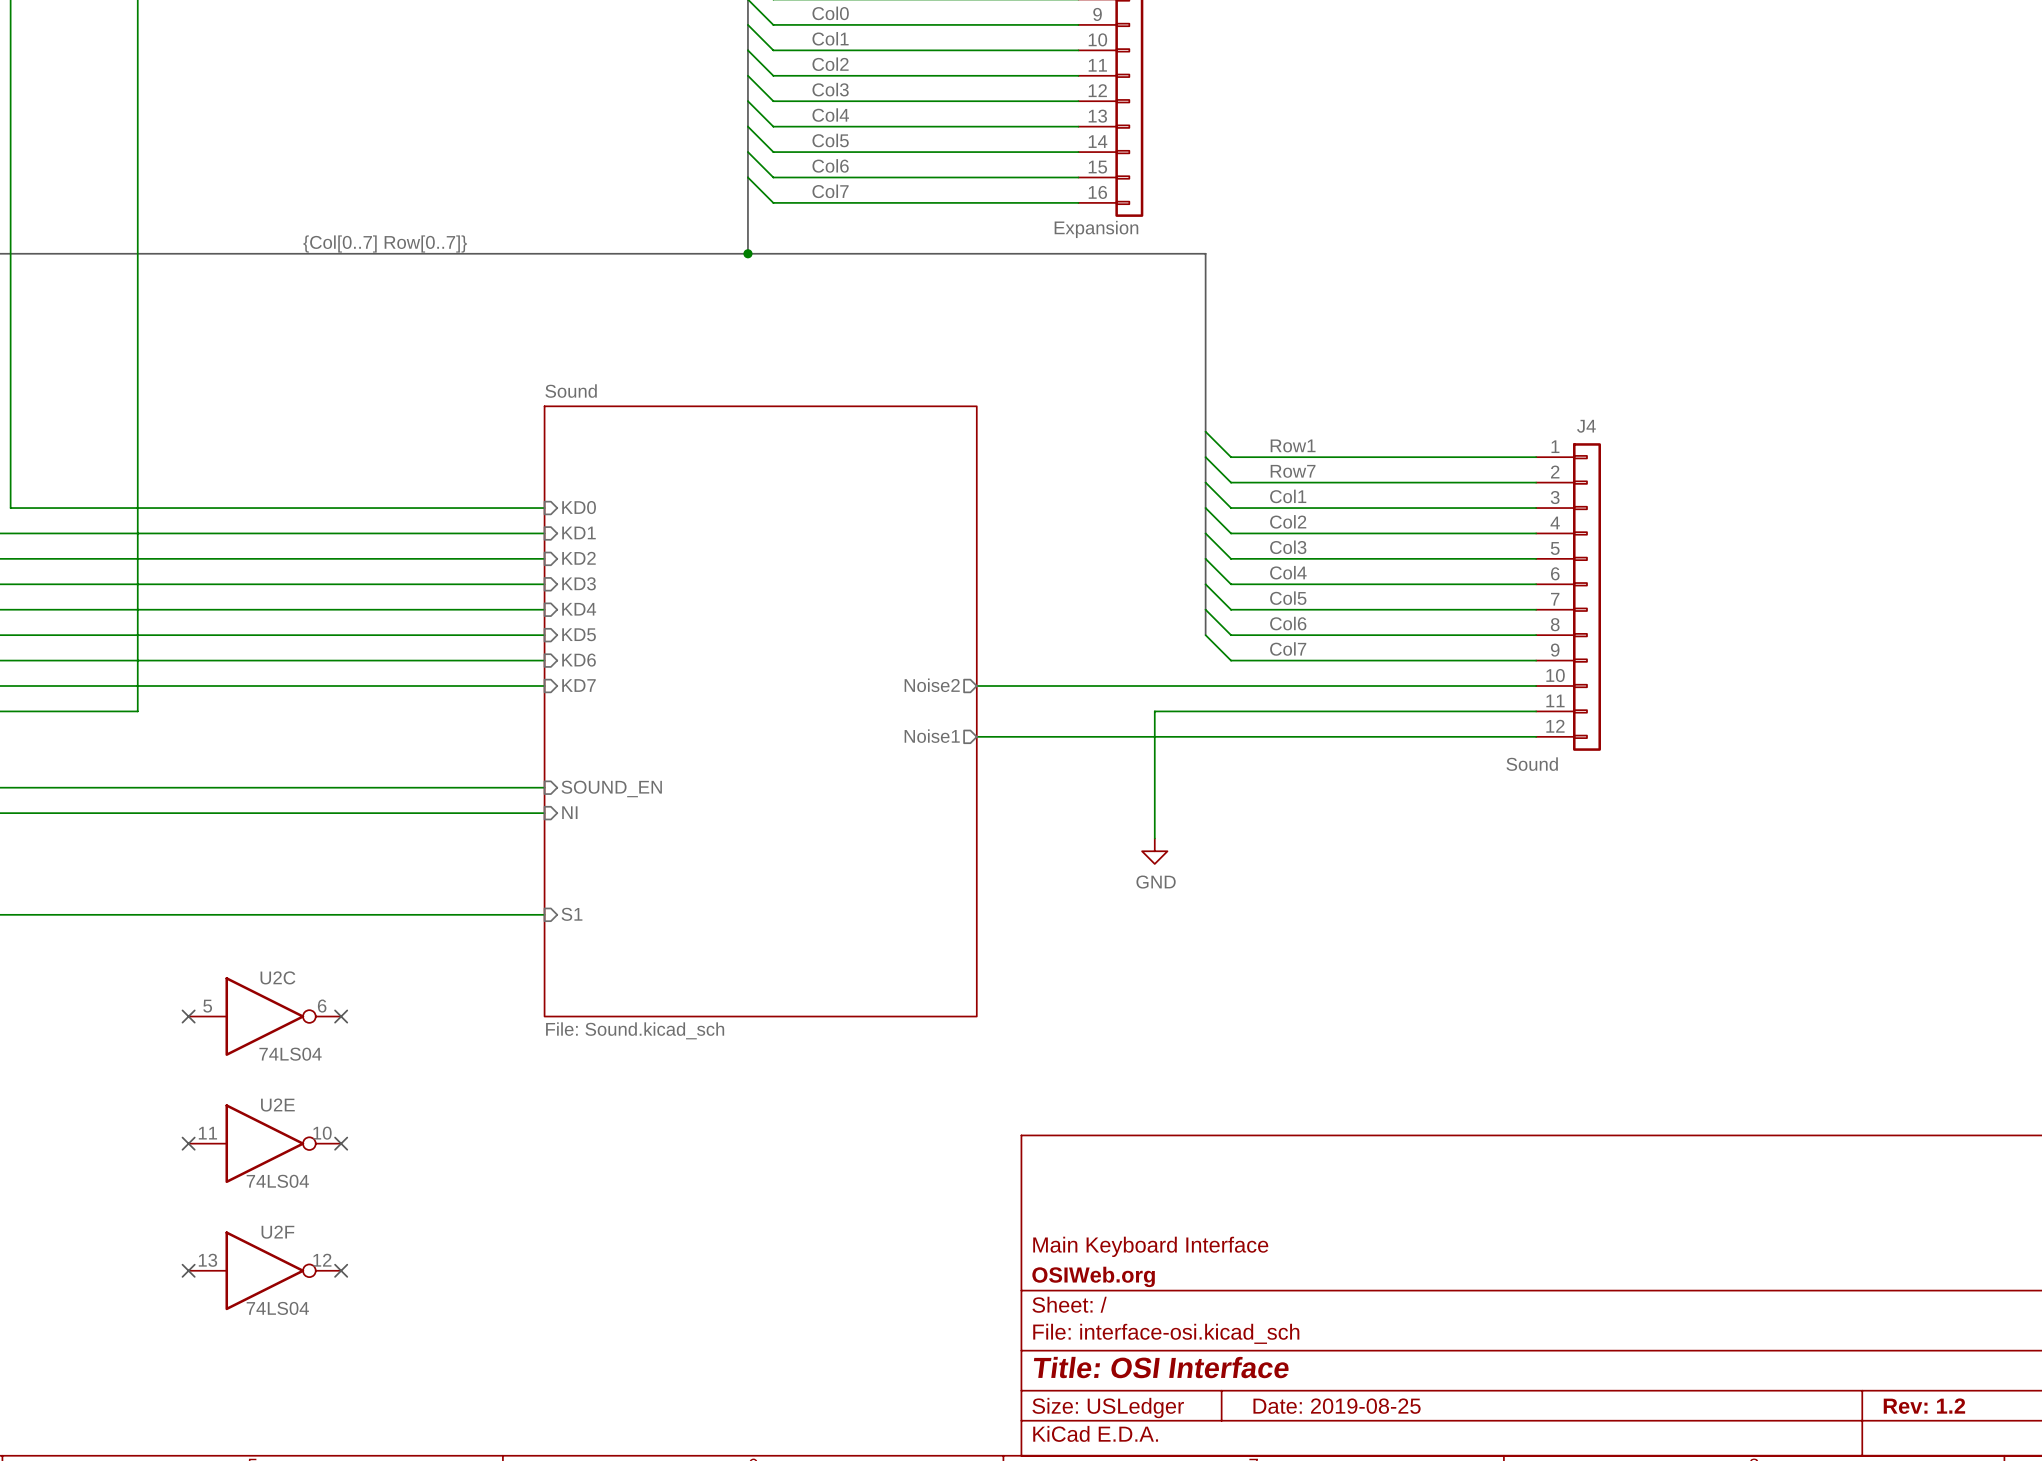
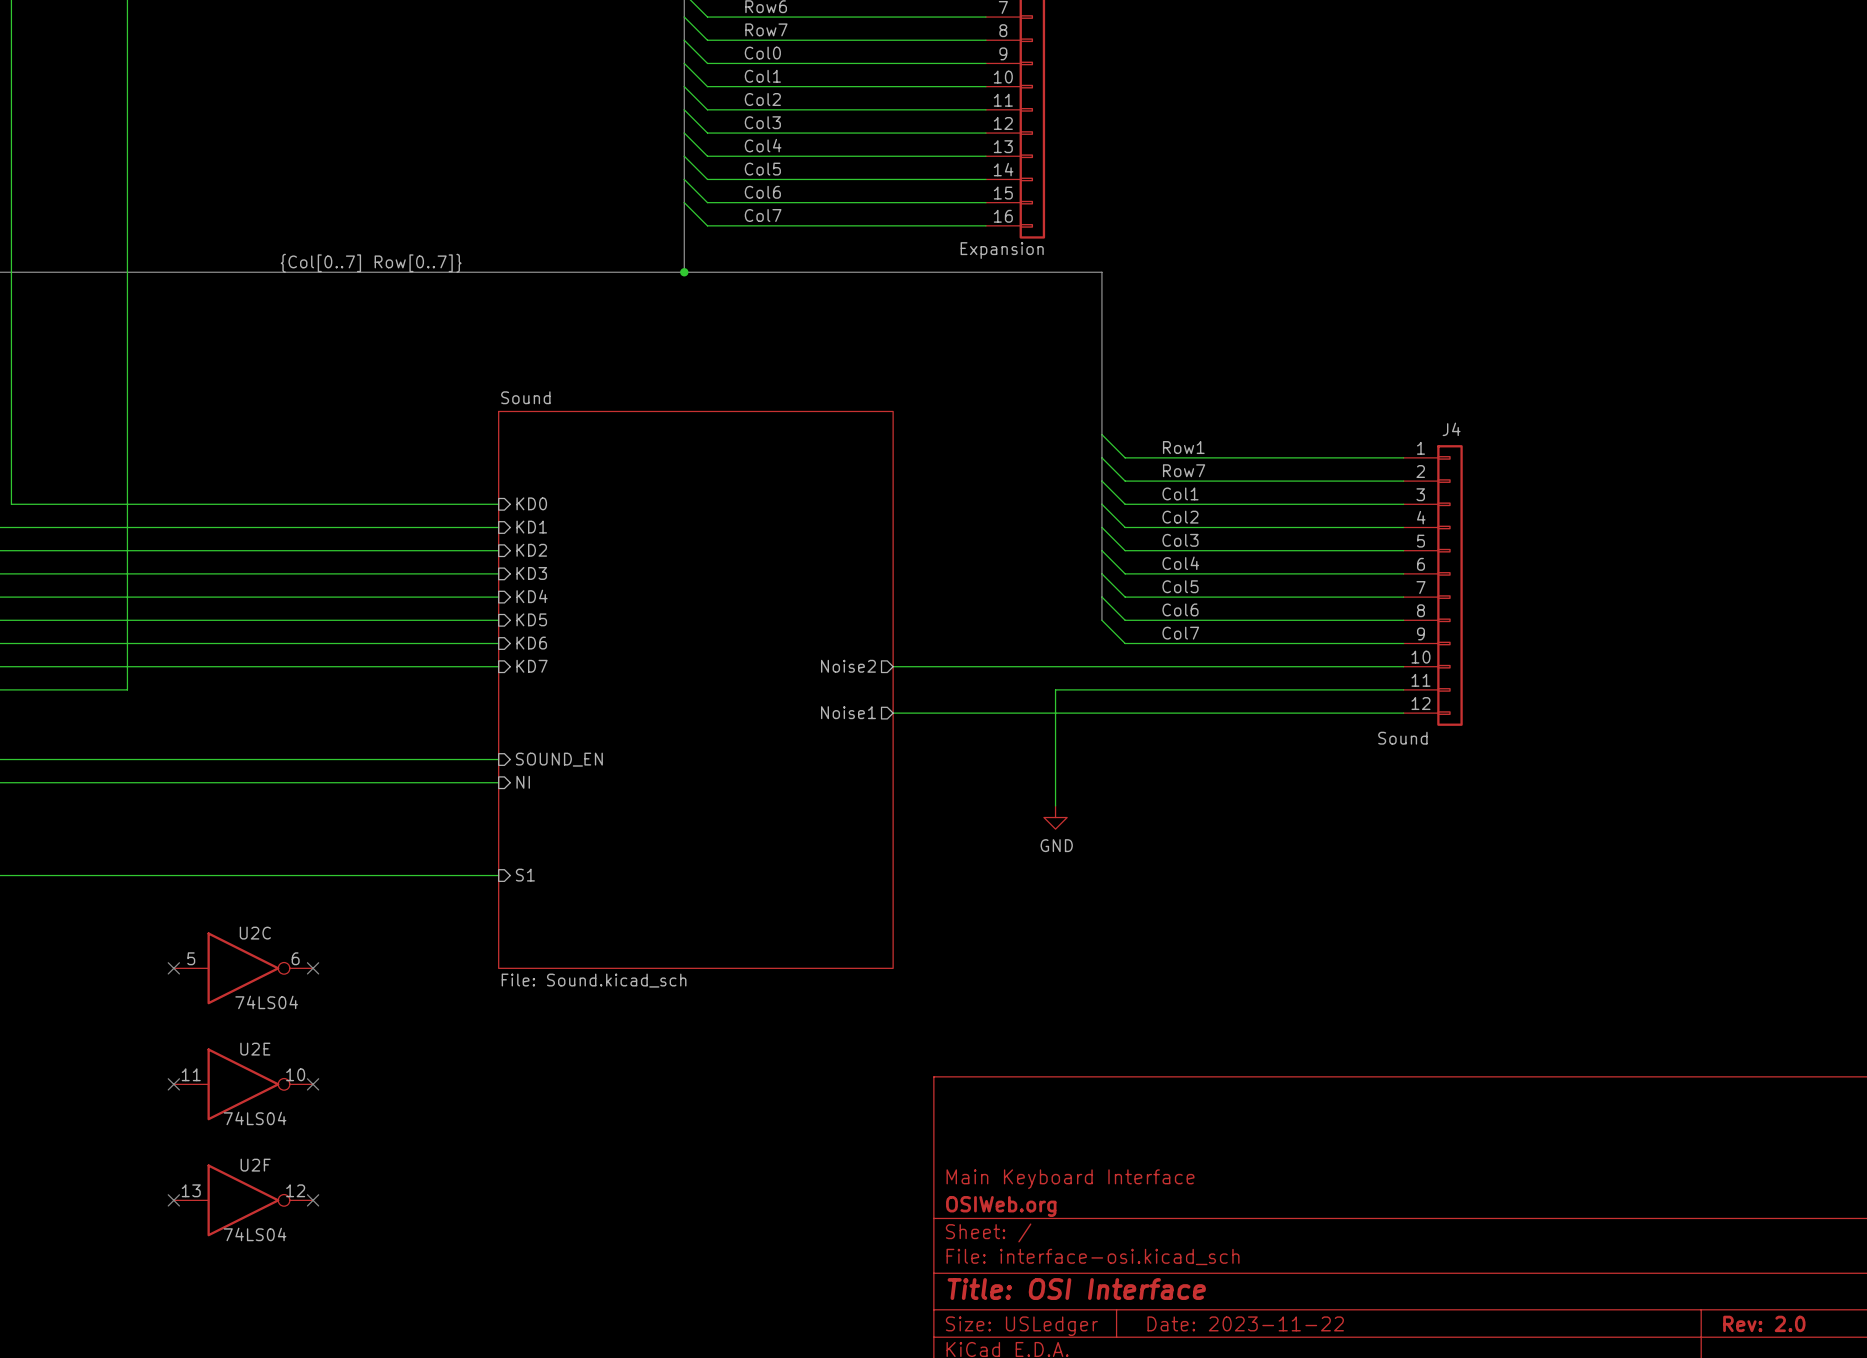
title block: Date: 2019-08-25 (1337, 1406) -> Date: 2023-11-22 (1245, 1323)
title block: Rev: 1.2 (1924, 1406) -> Rev: 2.0 (1764, 1323)

